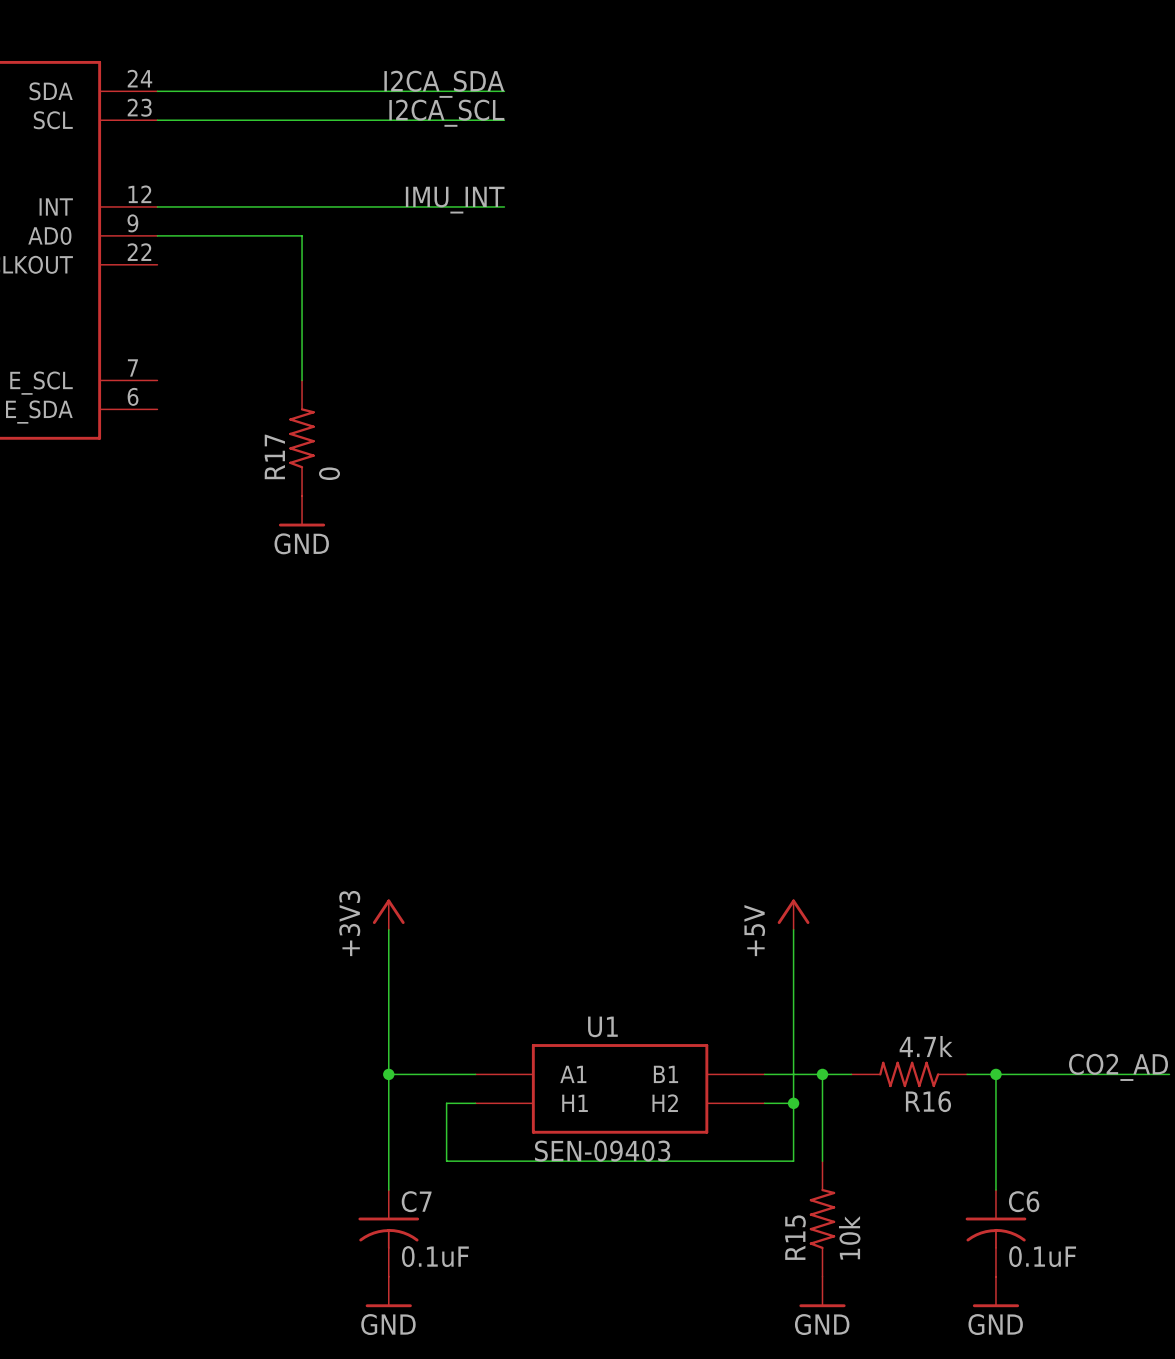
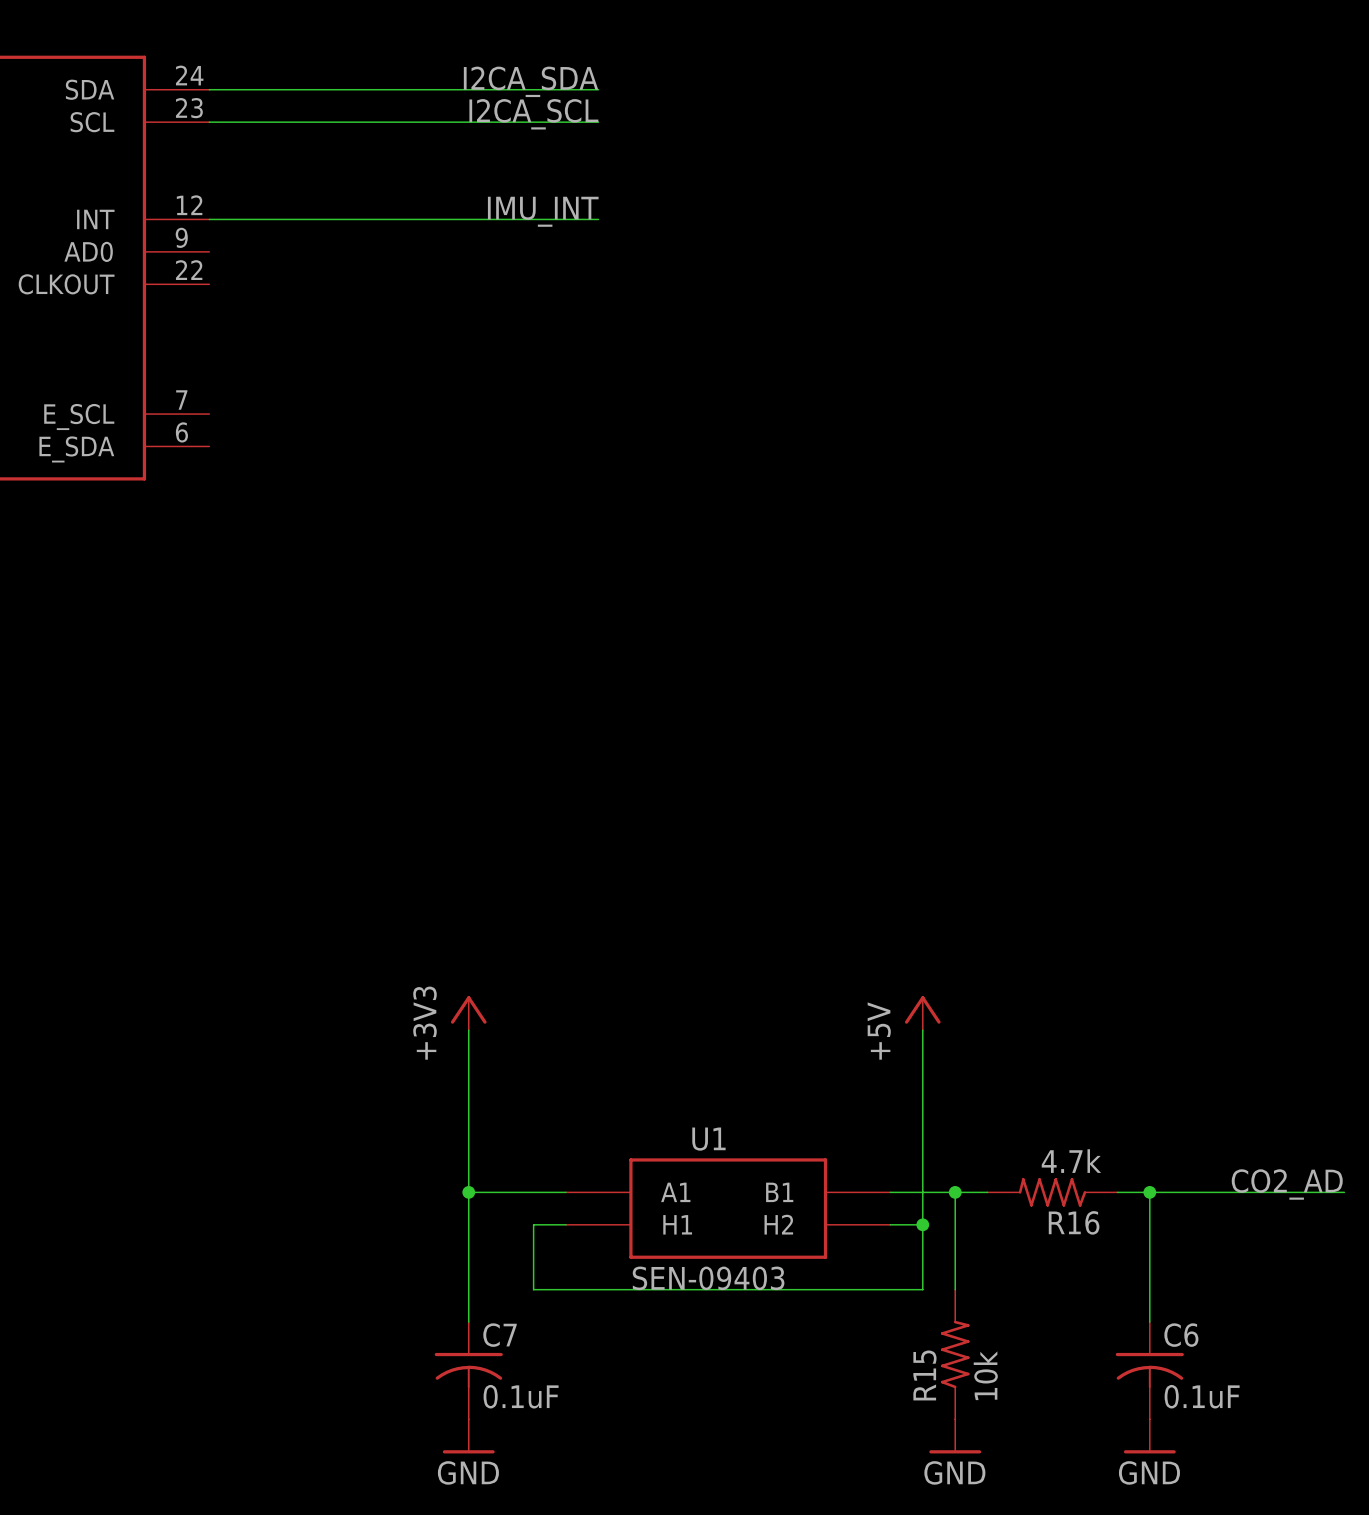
wire: (157, 235) (302, 235) (302, 380) -> none
R17: 0 (302, 438) -> none
power symbol: GND (302, 511) -> none

